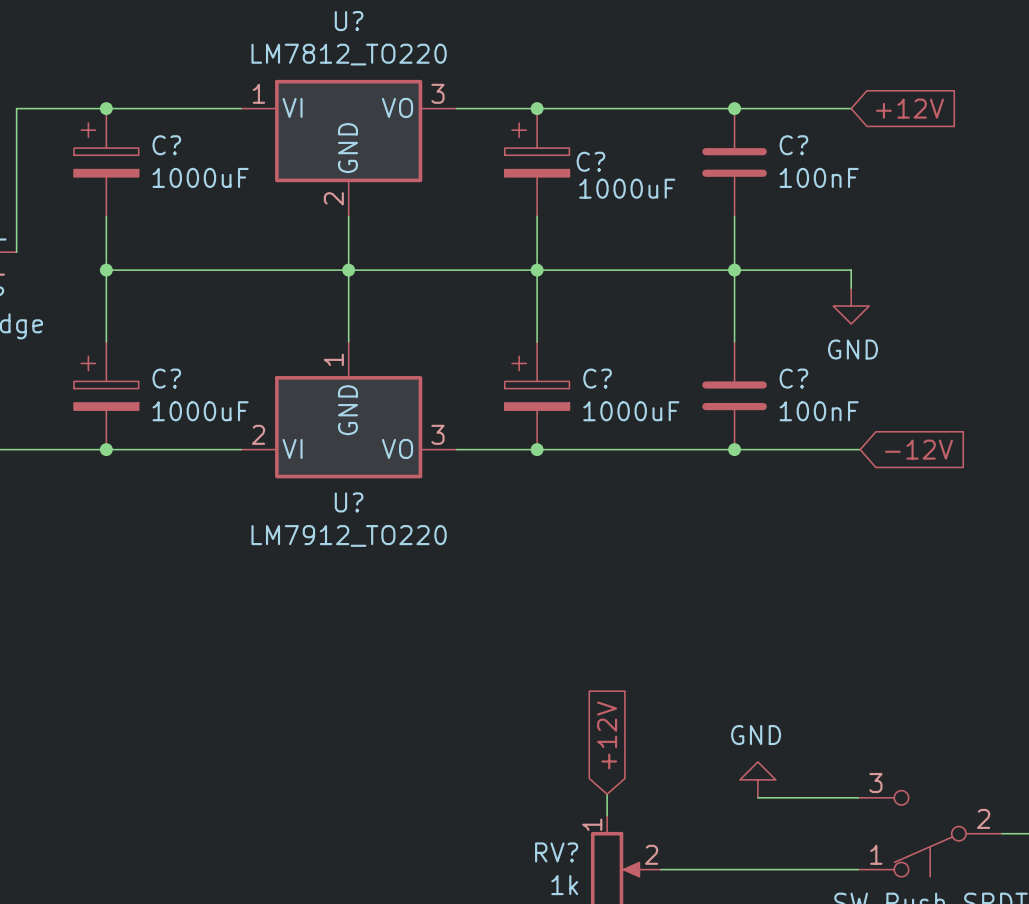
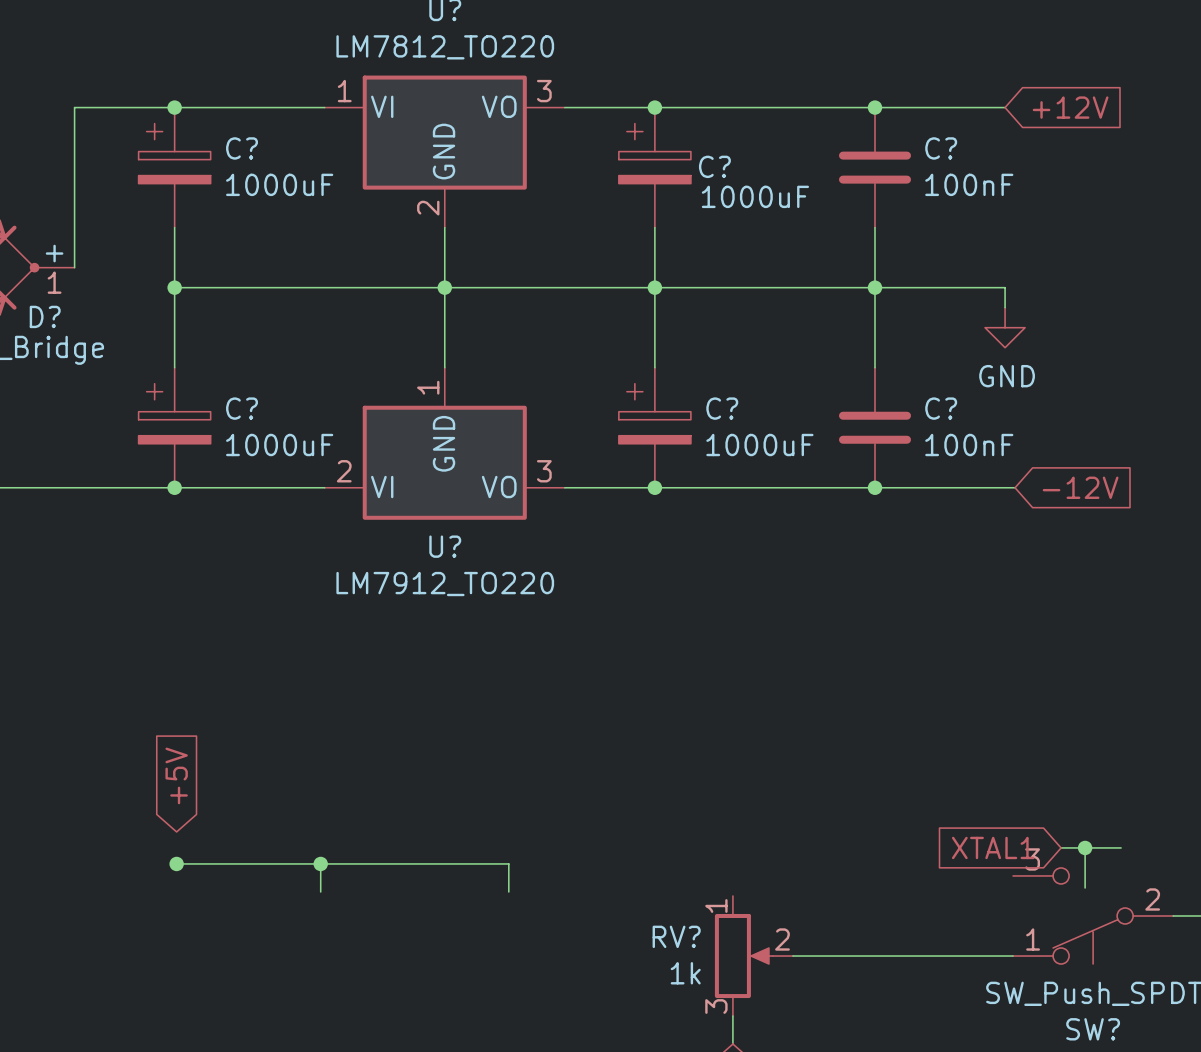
global label: none -> +5V (176, 775)
global label: +12V (607, 735) -> none
global label: none -> XTAL1 (993, 847)
wire: none -> (1061, 847) (1121, 847)
wire: none -> (1085, 847) (1085, 887)
junction: none -> (1085, 847)
power symbol: GND (757, 779) -> none
wire: none -> (176, 863) (508, 863) (508, 891)
junction: none -> (176, 863)
wire: none -> (320, 863) (320, 891)
junction: none -> (320, 863)
wire: (607, 794) (607, 815) -> none
wire: (757, 797) (858, 797) -> none

